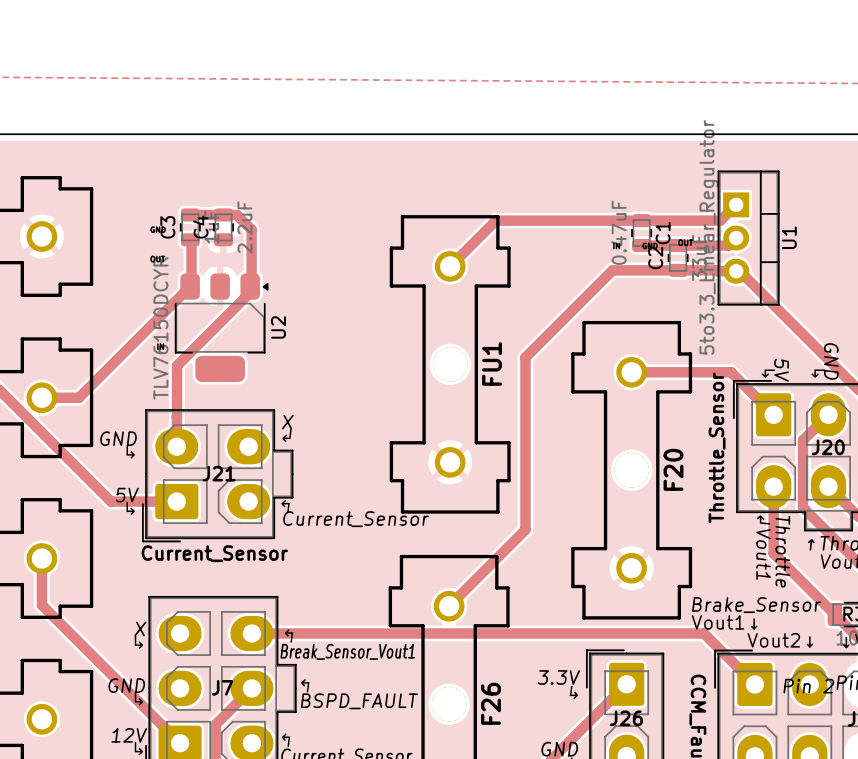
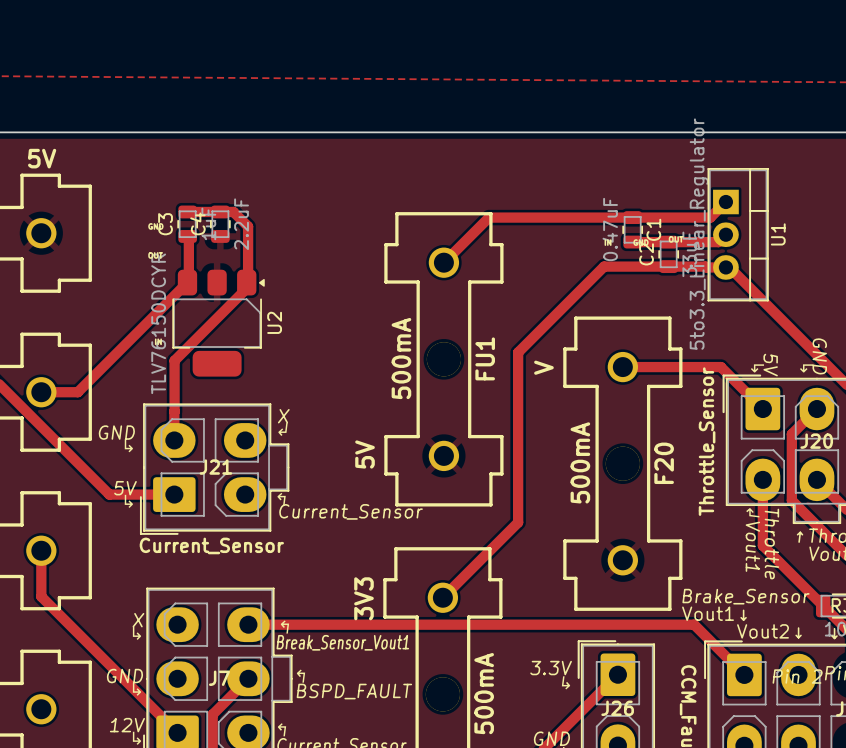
part text: none -> 5V (42, 158)
FU1 value: none -> 500mA (401, 358)
F20 text: none -> V (543, 367)
FU1 text: none -> 5V (365, 454)
F20 value: none -> 500mA (580, 462)
F26 text: none -> 3V3 (363, 598)
F26 name: F26 (490, 703) -> none
F26 value: none -> 500mA (484, 693)

